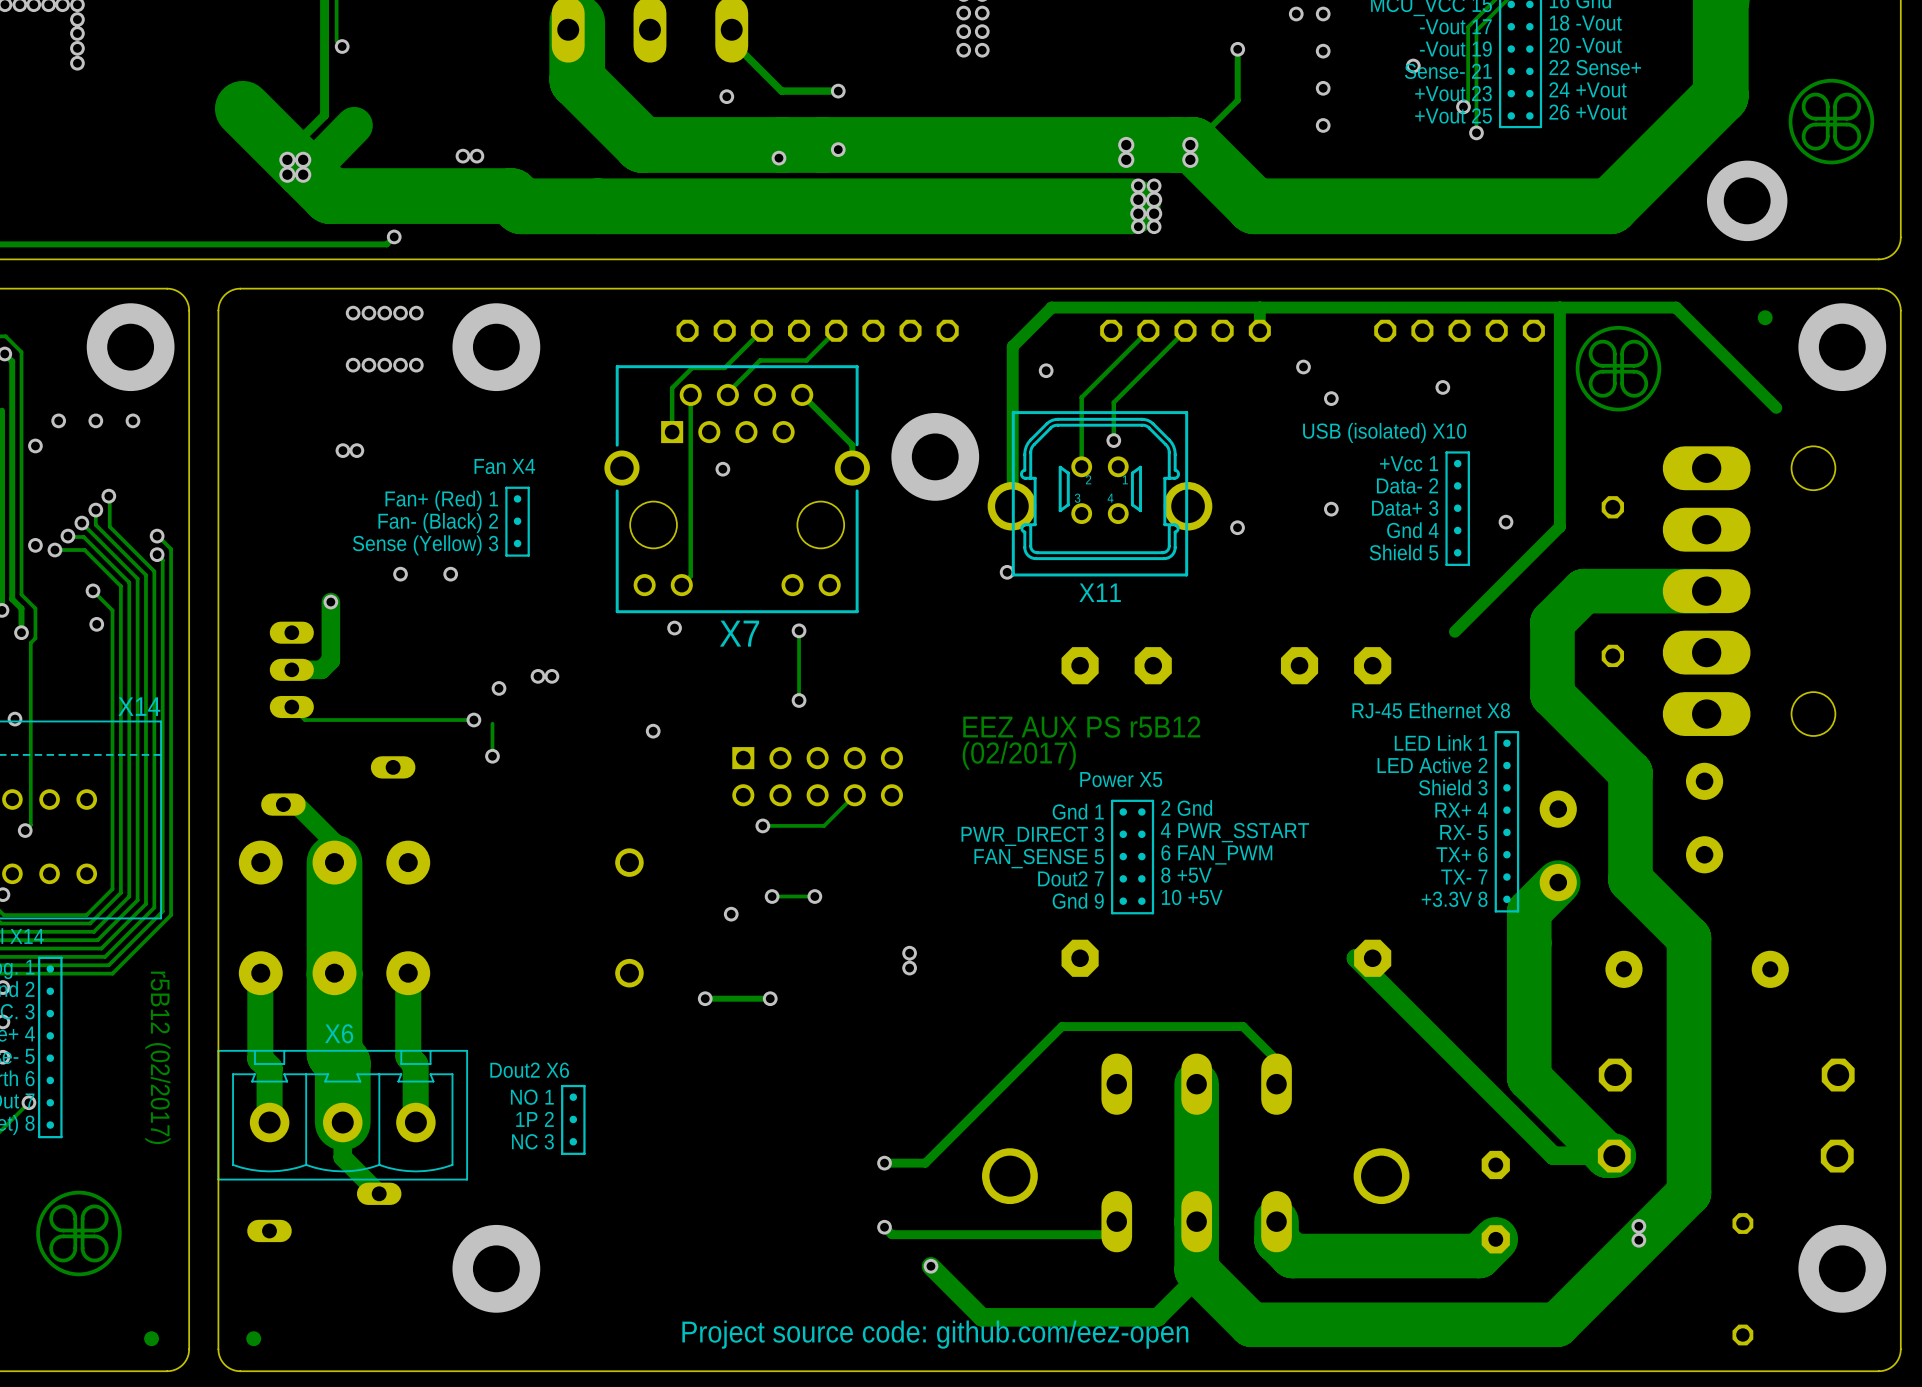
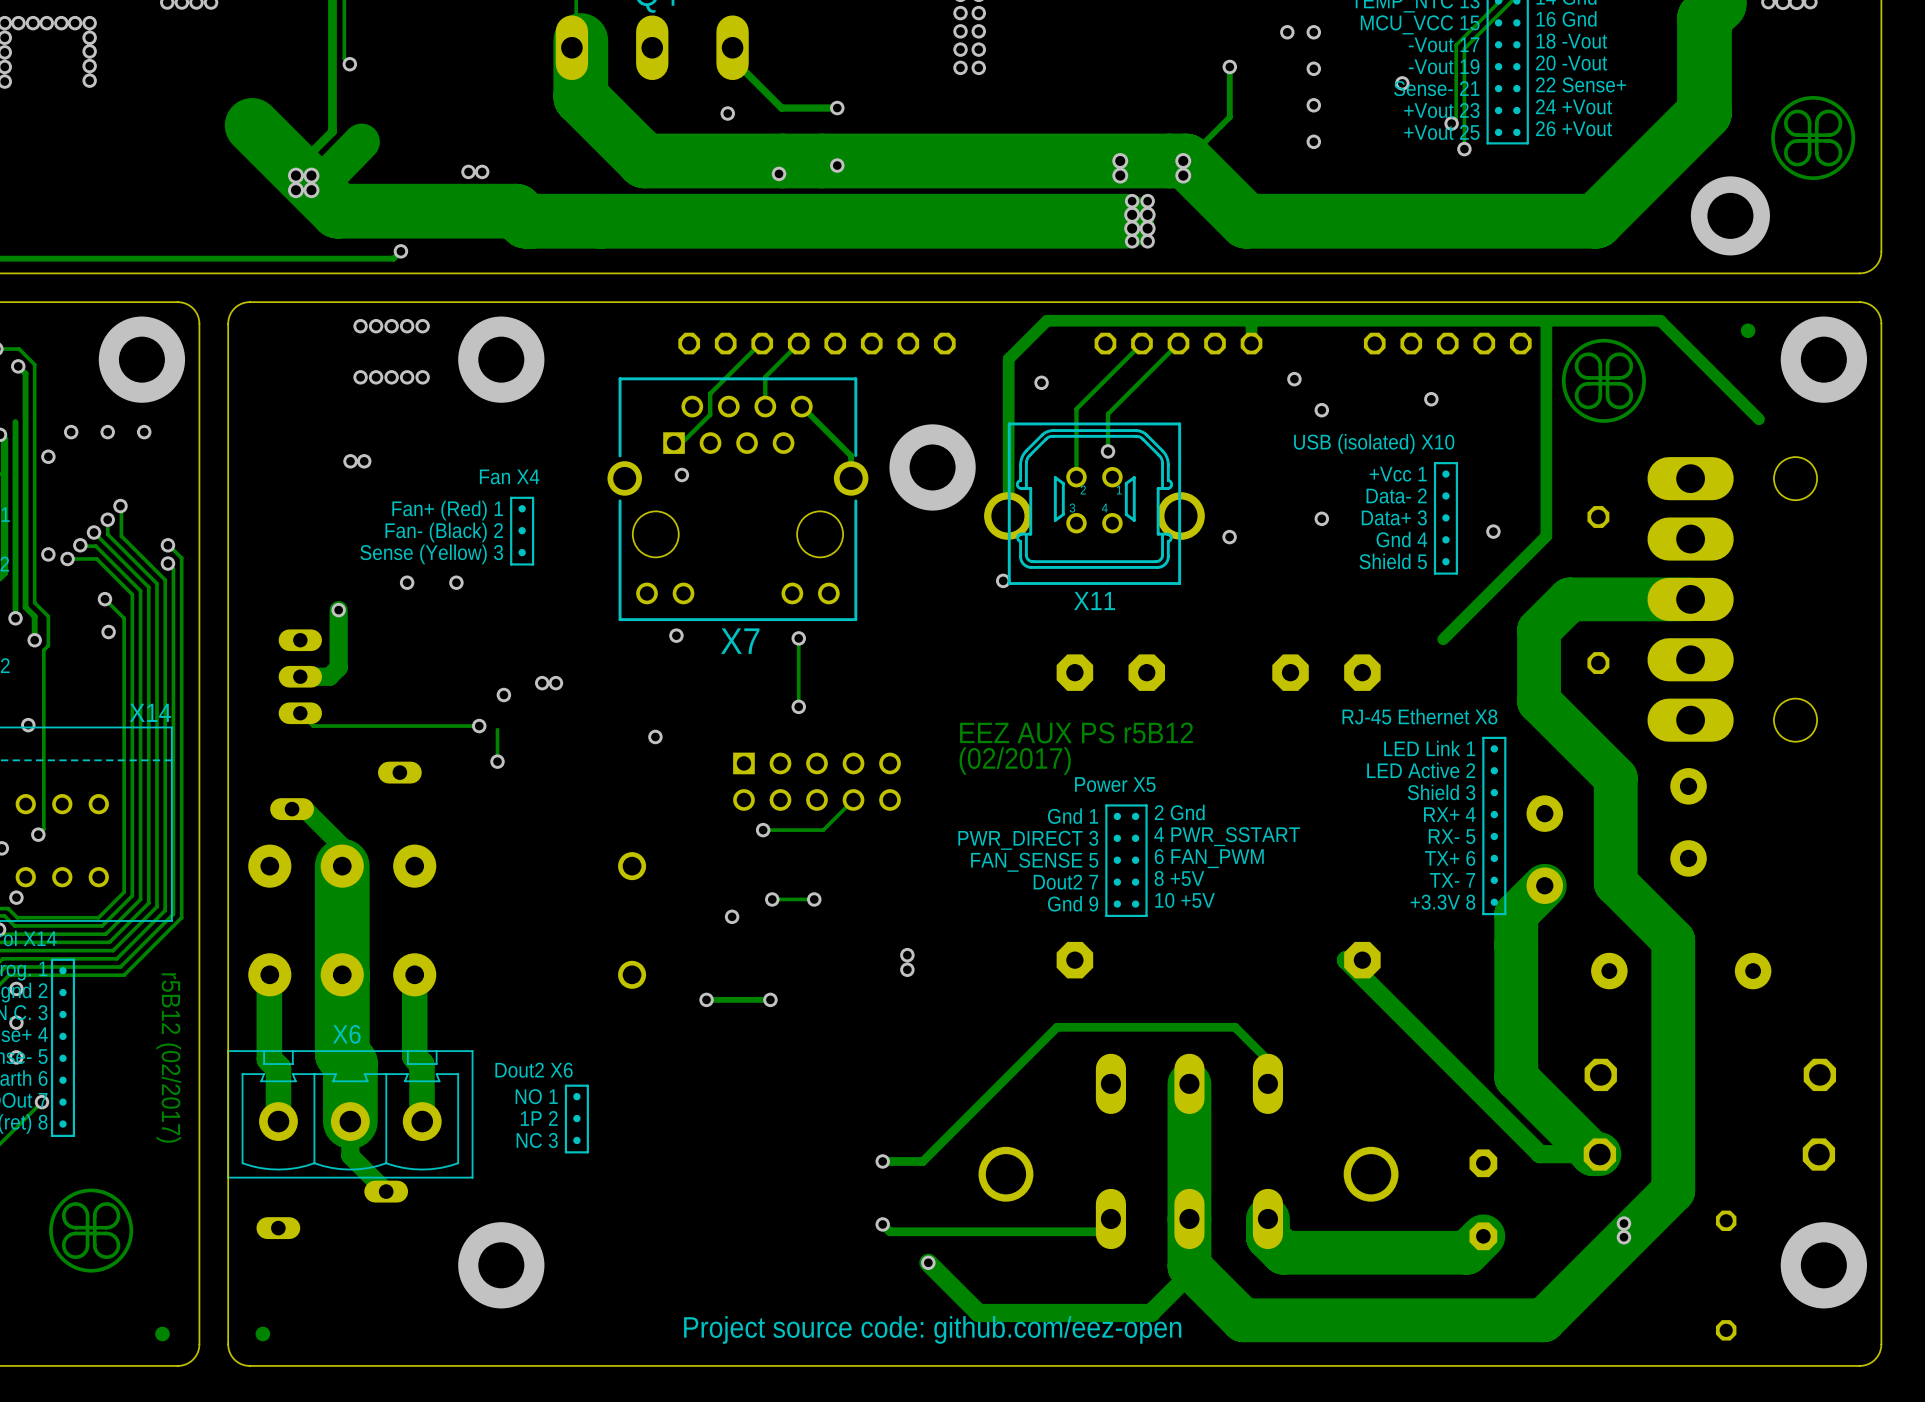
track: (761, 330) (724, 367) (692, 367) (672, 388) (672, 432) -> (762, 343) (710, 393) (710, 414) (681, 443) (674, 443)
track: none -> (798, 343) (765, 376) (765, 406)
track: (836, 330) (806, 360) (760, 360) (727, 392) (727, 394) -> none
track: (690, 394) (690, 576) (681, 585) -> none
via position: (722, 469) -> (681, 475)

